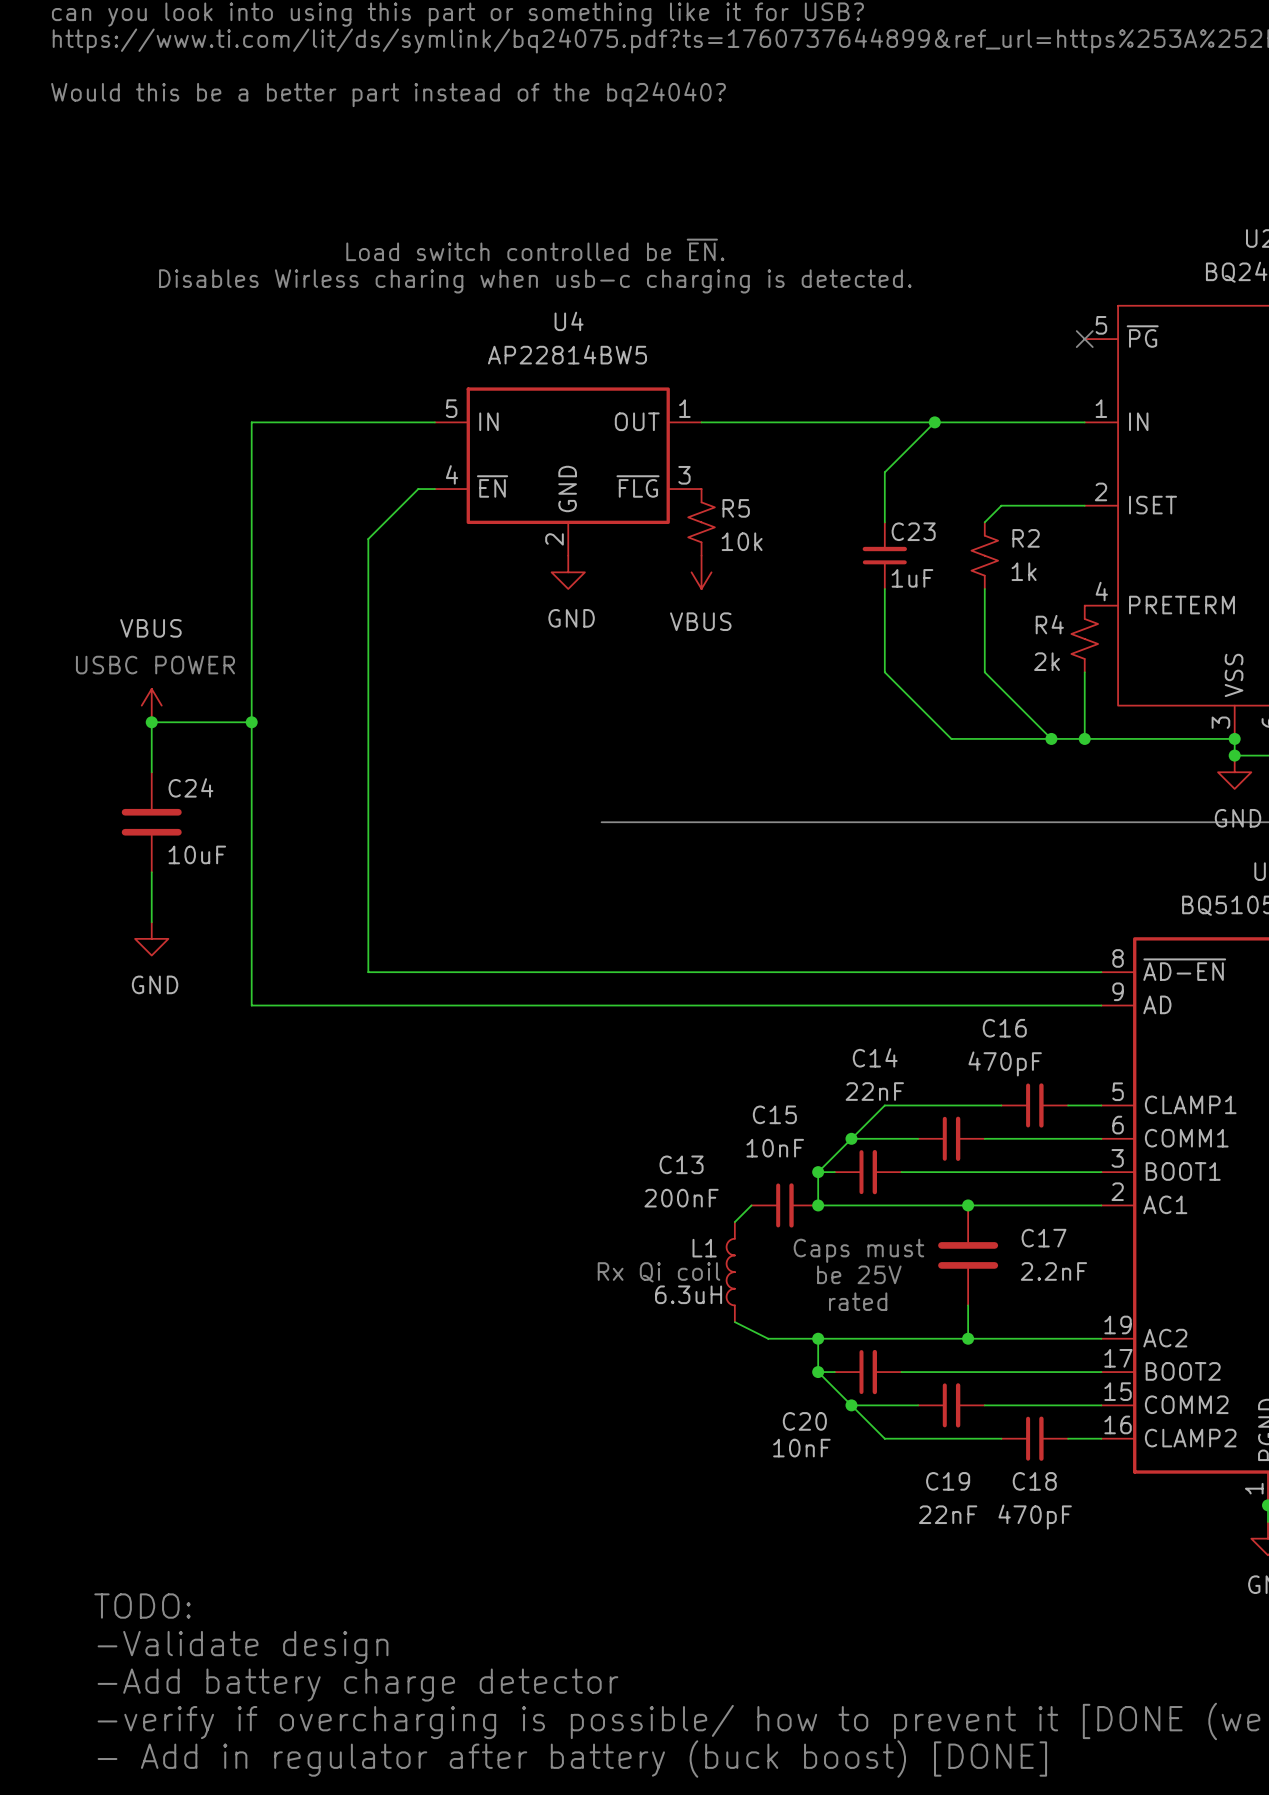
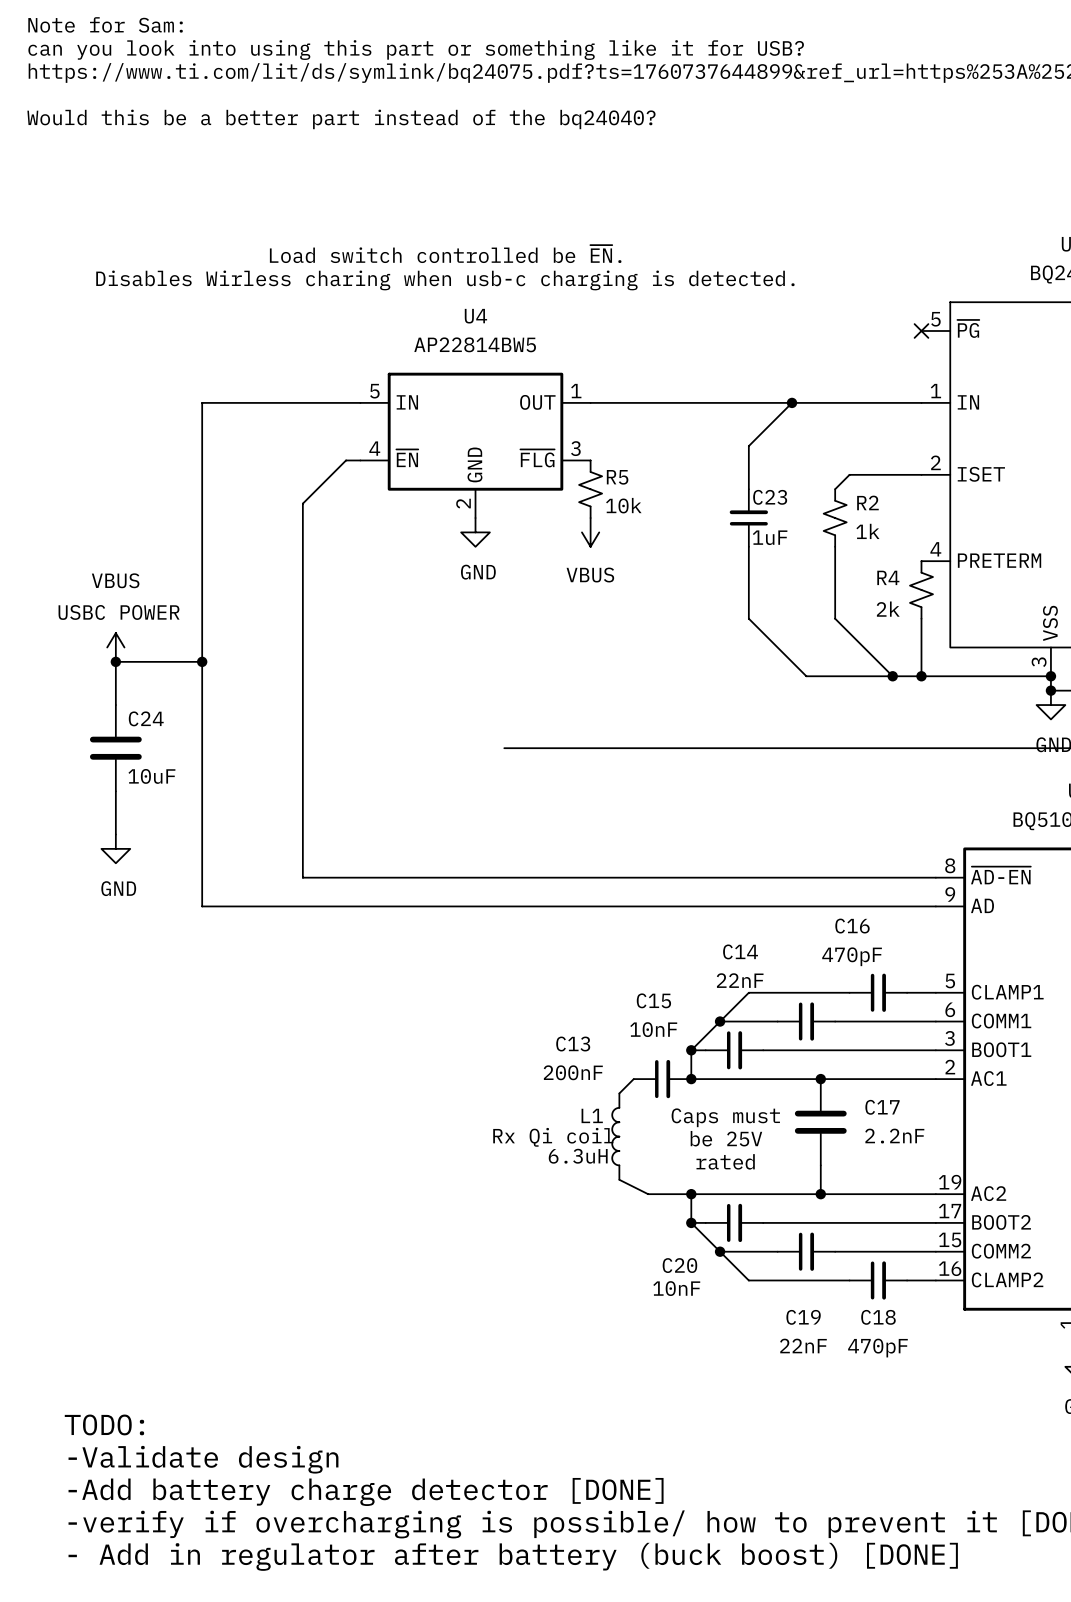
text: -Add battery charge detector (357, 1685) -> -Add battery charge detector [DONE] (366, 1491)

